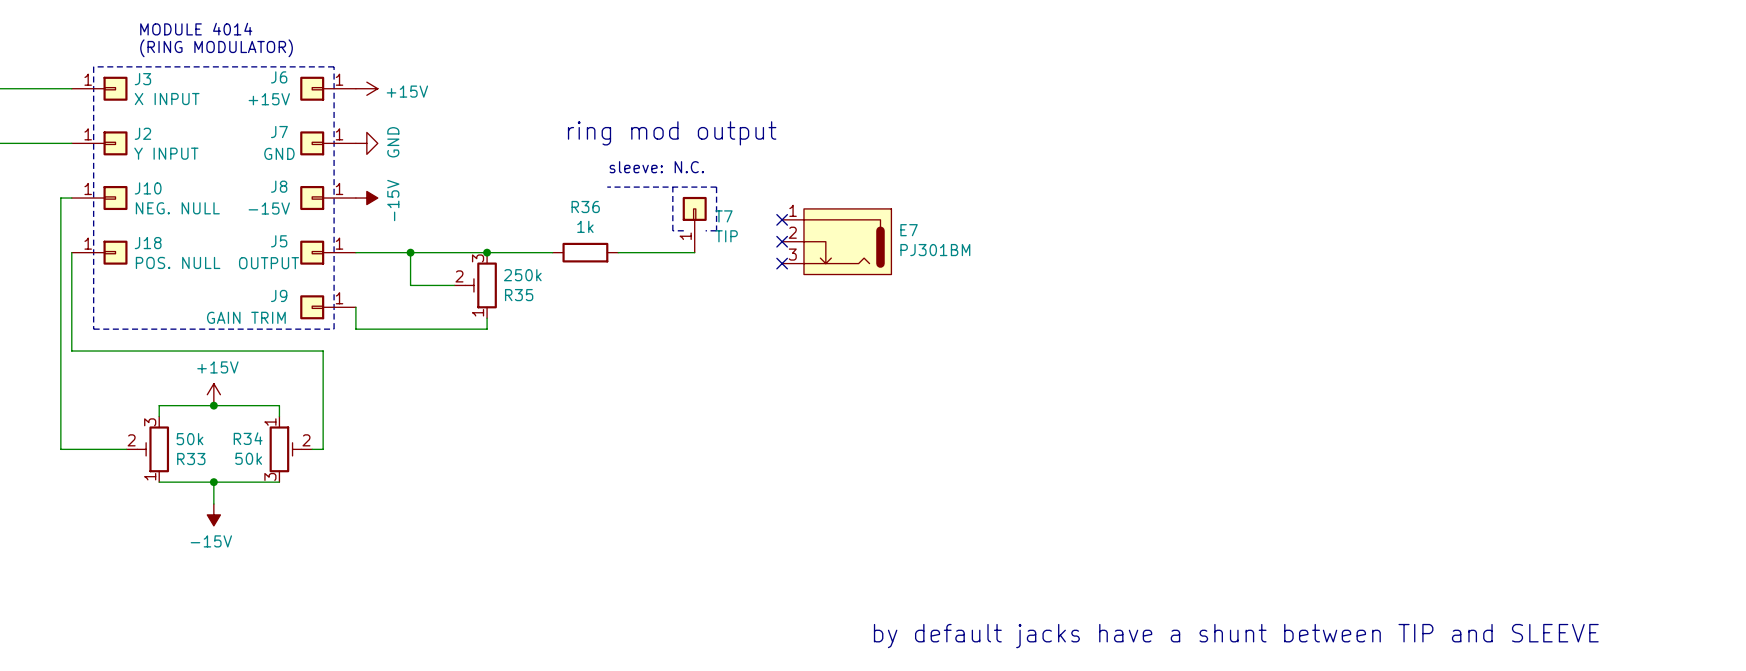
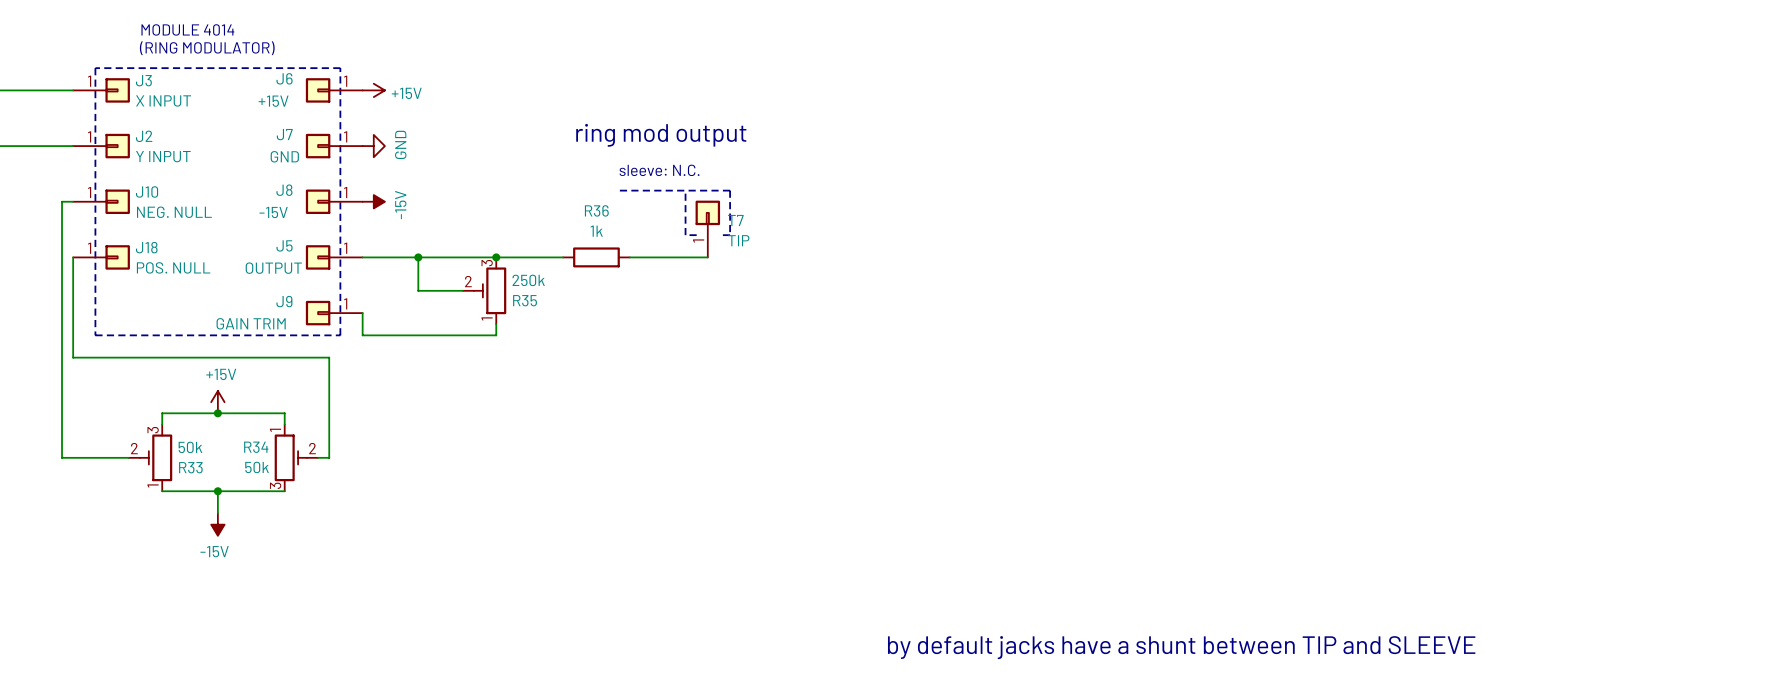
no-connect mark: (782, 219) -> none
no-connect mark: (782, 241) -> none
E7: PJ301BM (836, 241) -> none
no-connect mark: (782, 263) -> none

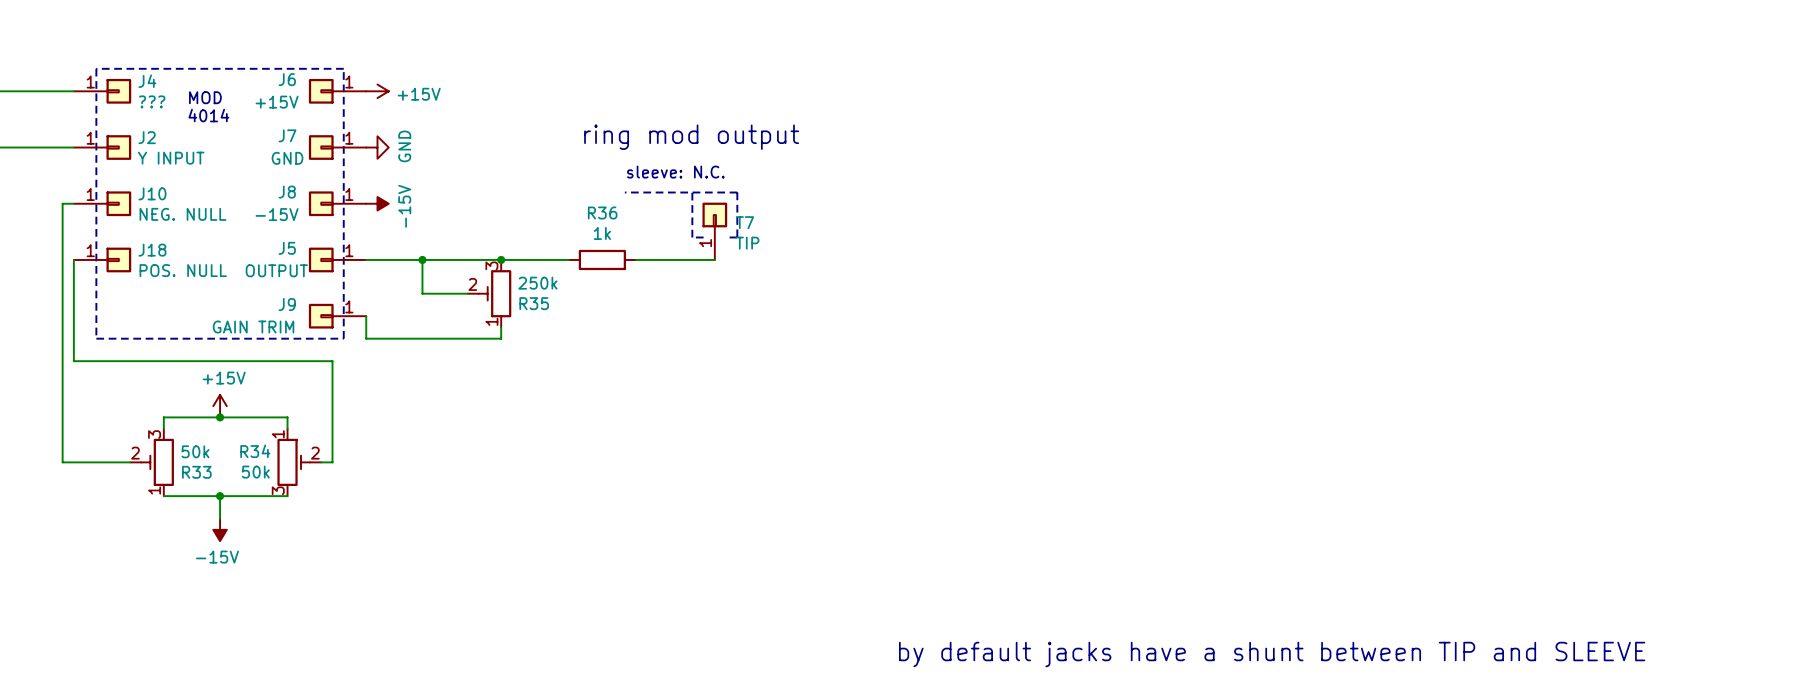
text: MODULE 4014 (187, 29) -> none
text: (RING MODULATOR) (207, 48) -> none
J3 name: J3 (143, 80) -> J4 (147, 81)
text: none -> MOD (205, 97)
J3 value: X INPUT (163, 100) -> ??? (152, 101)
text: none -> 4014 (208, 115)

